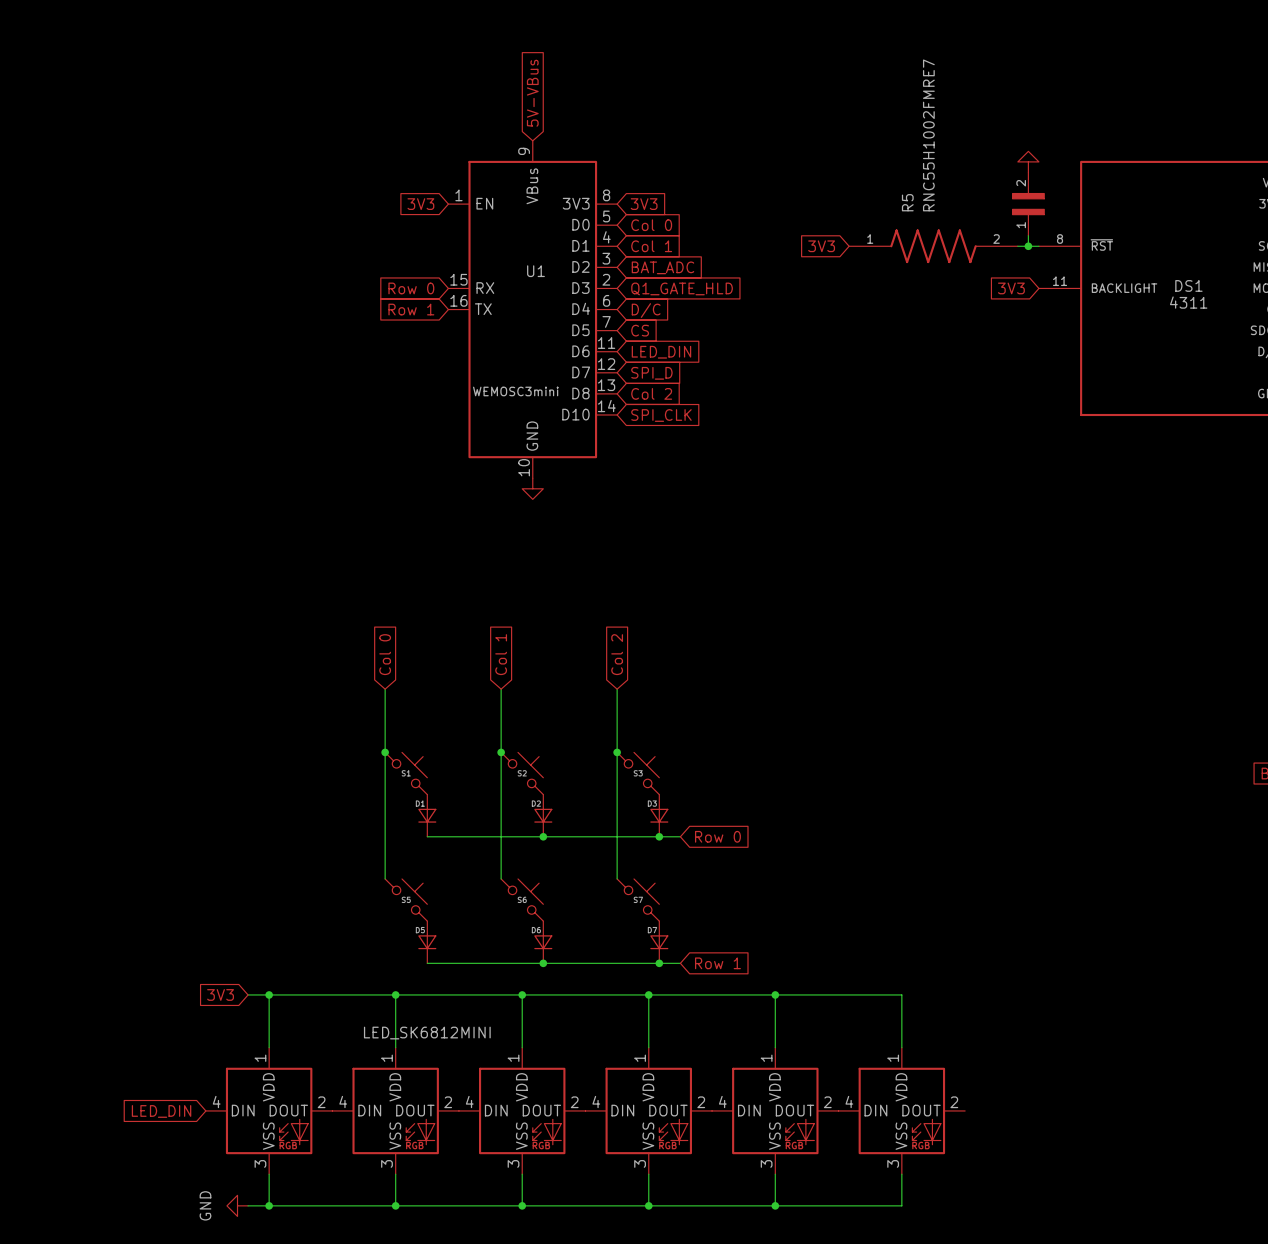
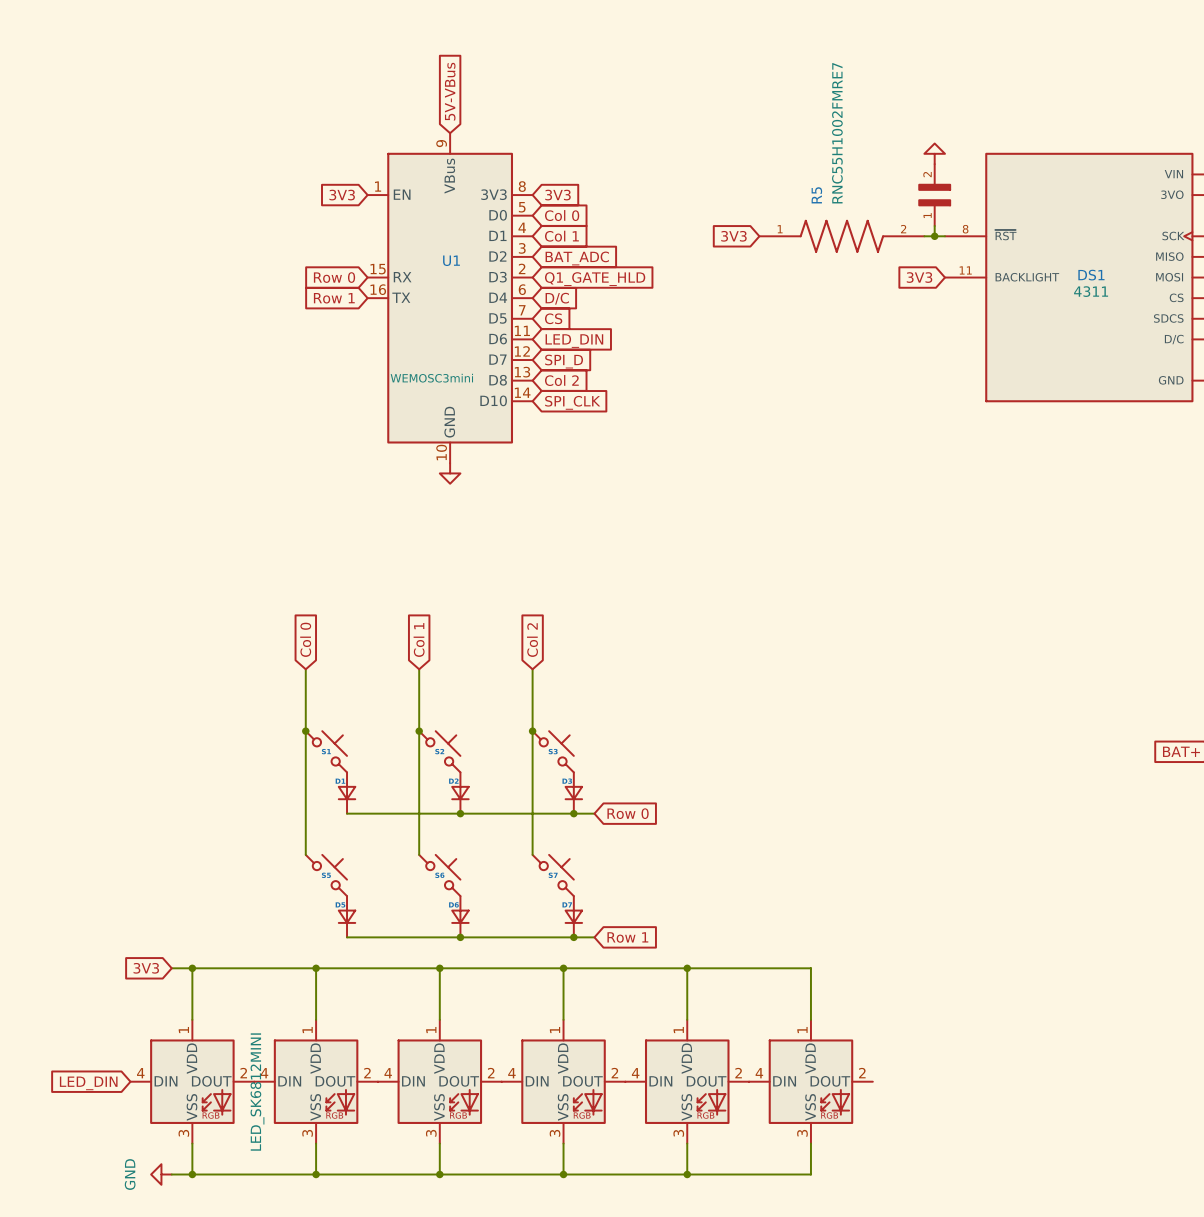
part value: LED_SK6812MINI (427, 1033) -> none
part value: none -> LED_SK6812MINI (257, 1092)

